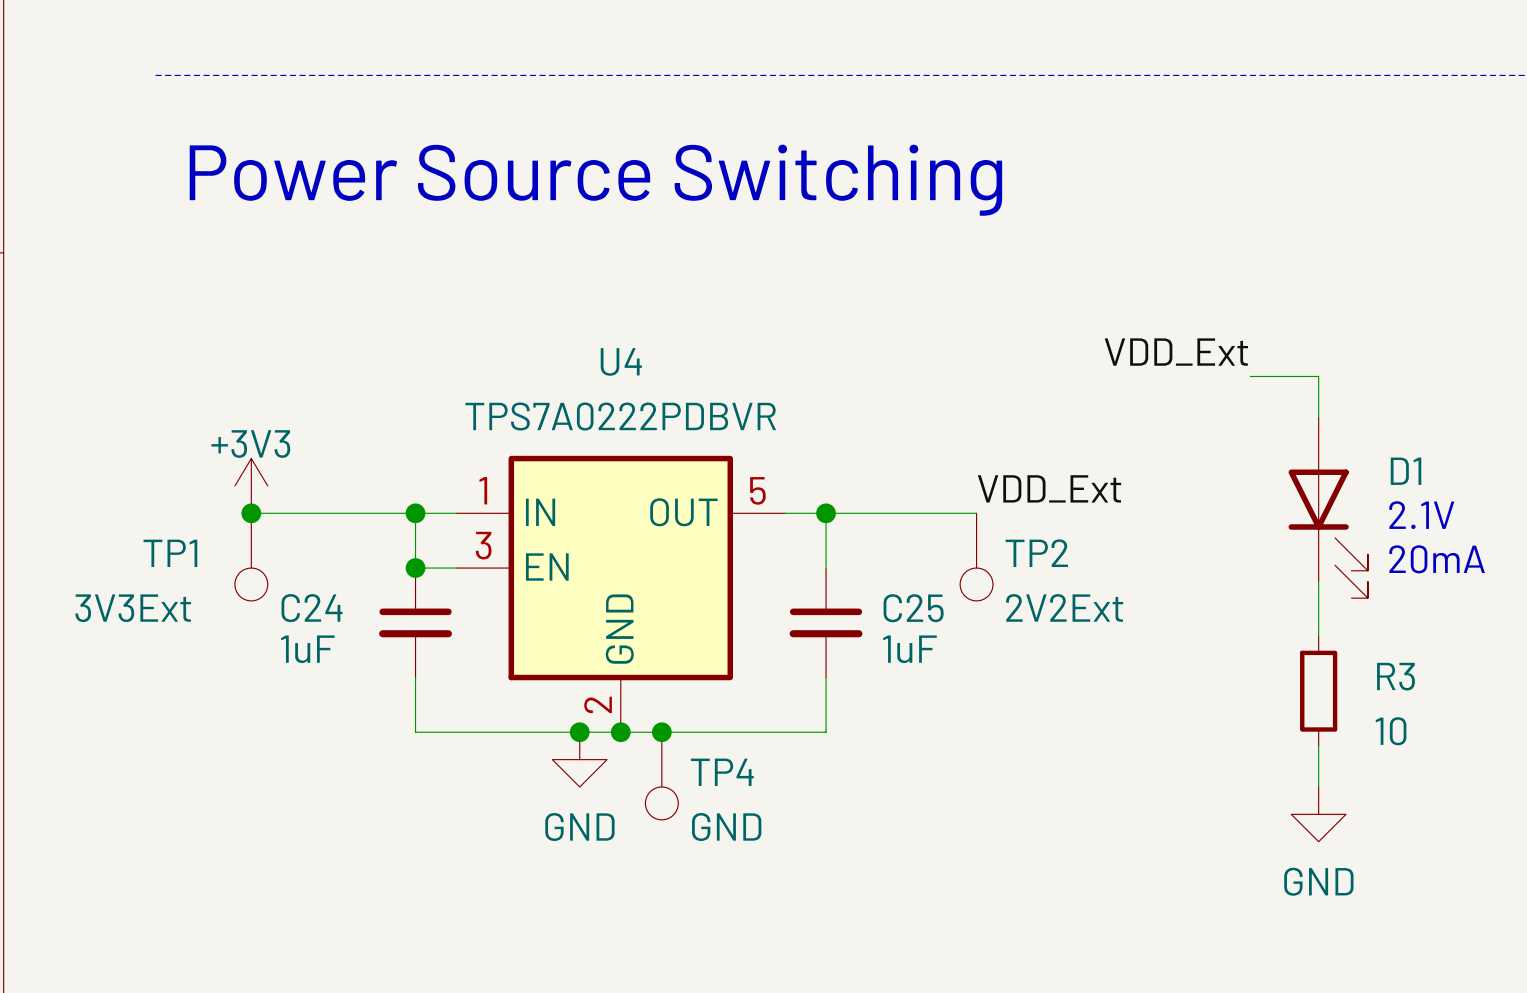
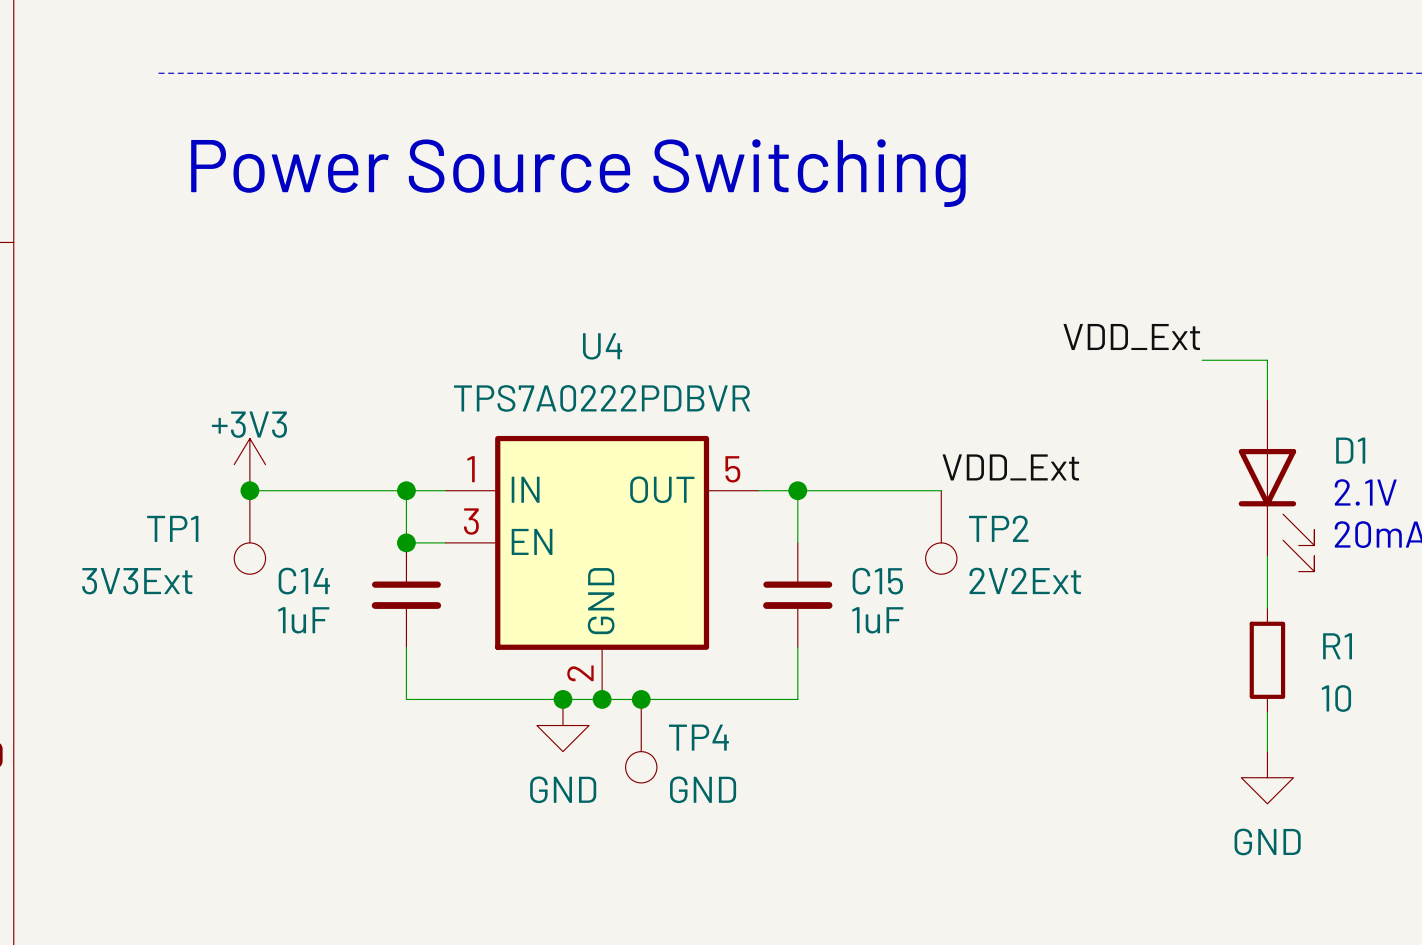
C24 name: C24 (312, 608) -> C14 (304, 581)
C25 name: C25 (913, 608) -> C15 (877, 581)
R3 name: R3 (1395, 676) -> R1 (1337, 646)

